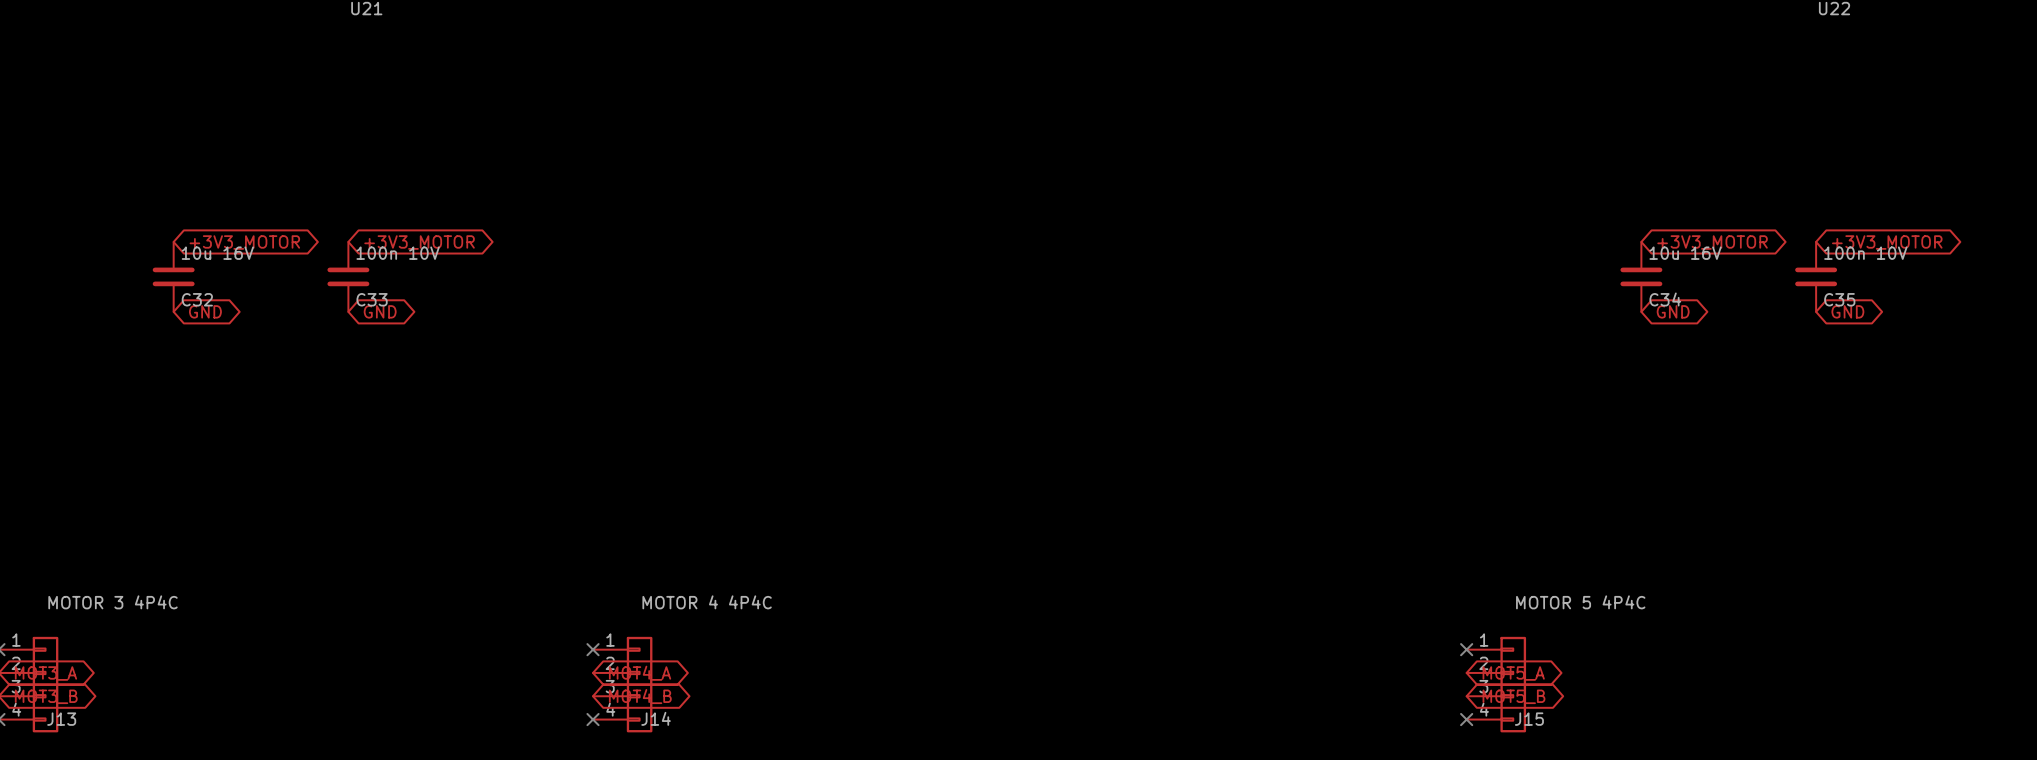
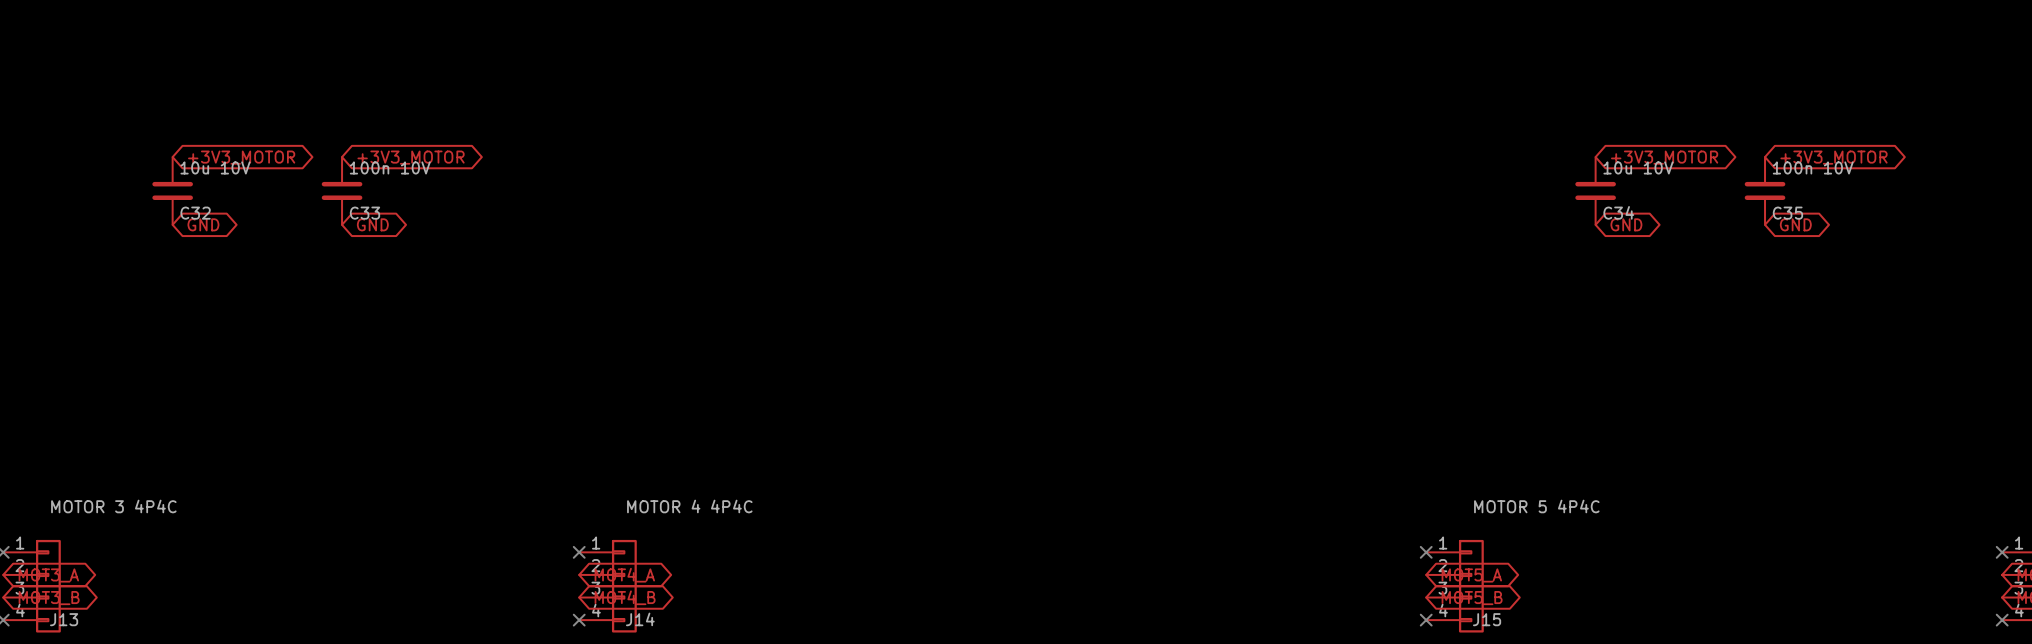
C32 value: 10u 16V (217, 253) -> 10u 10V (215, 167)
C34 value: 10u 16V (1685, 253) -> 10u 10V (1638, 167)

